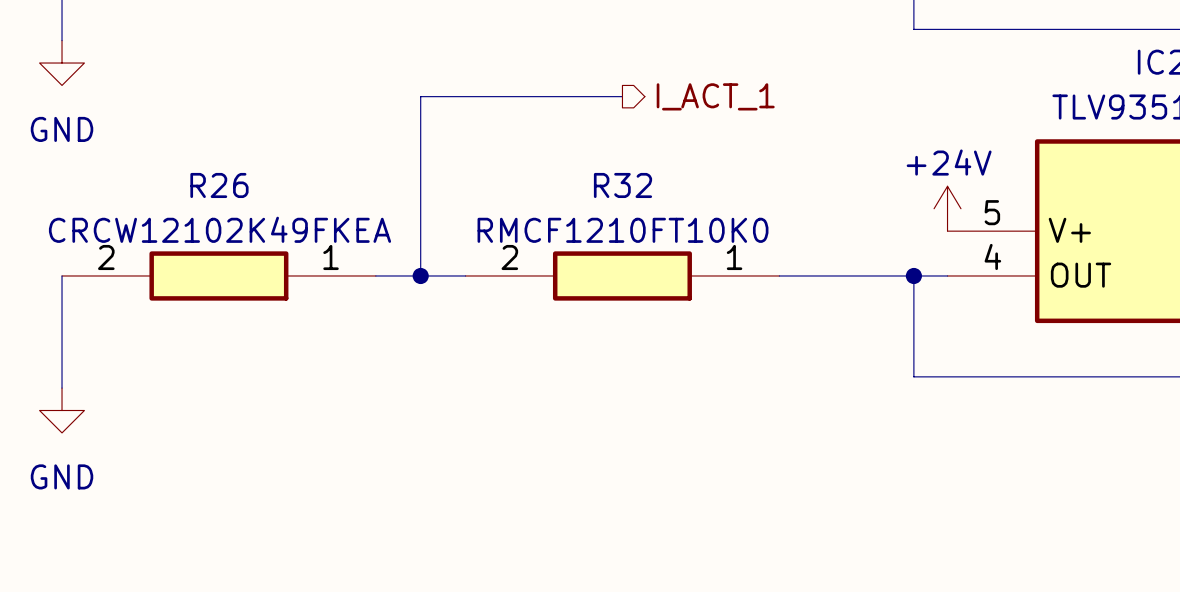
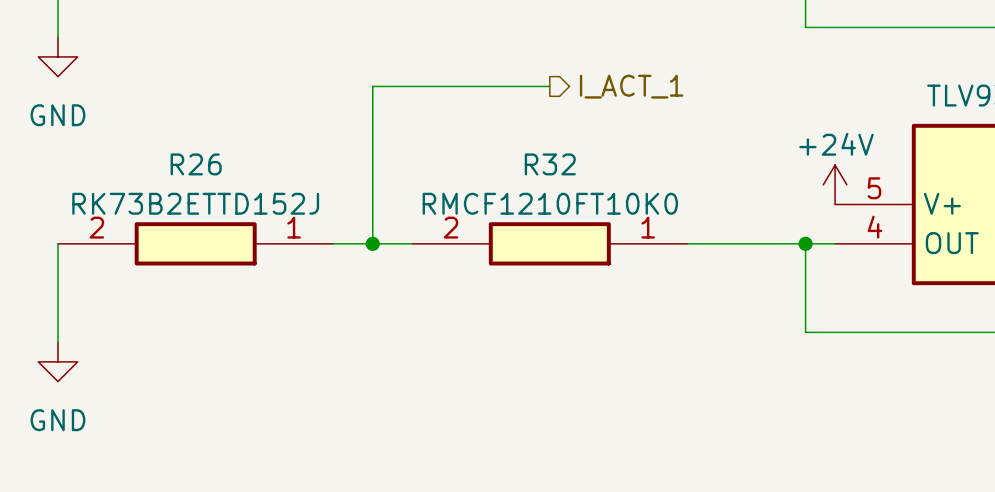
R26 value: CRCW12102K49FKEA (220, 229) -> RK73B2ETTD152J (195, 203)

